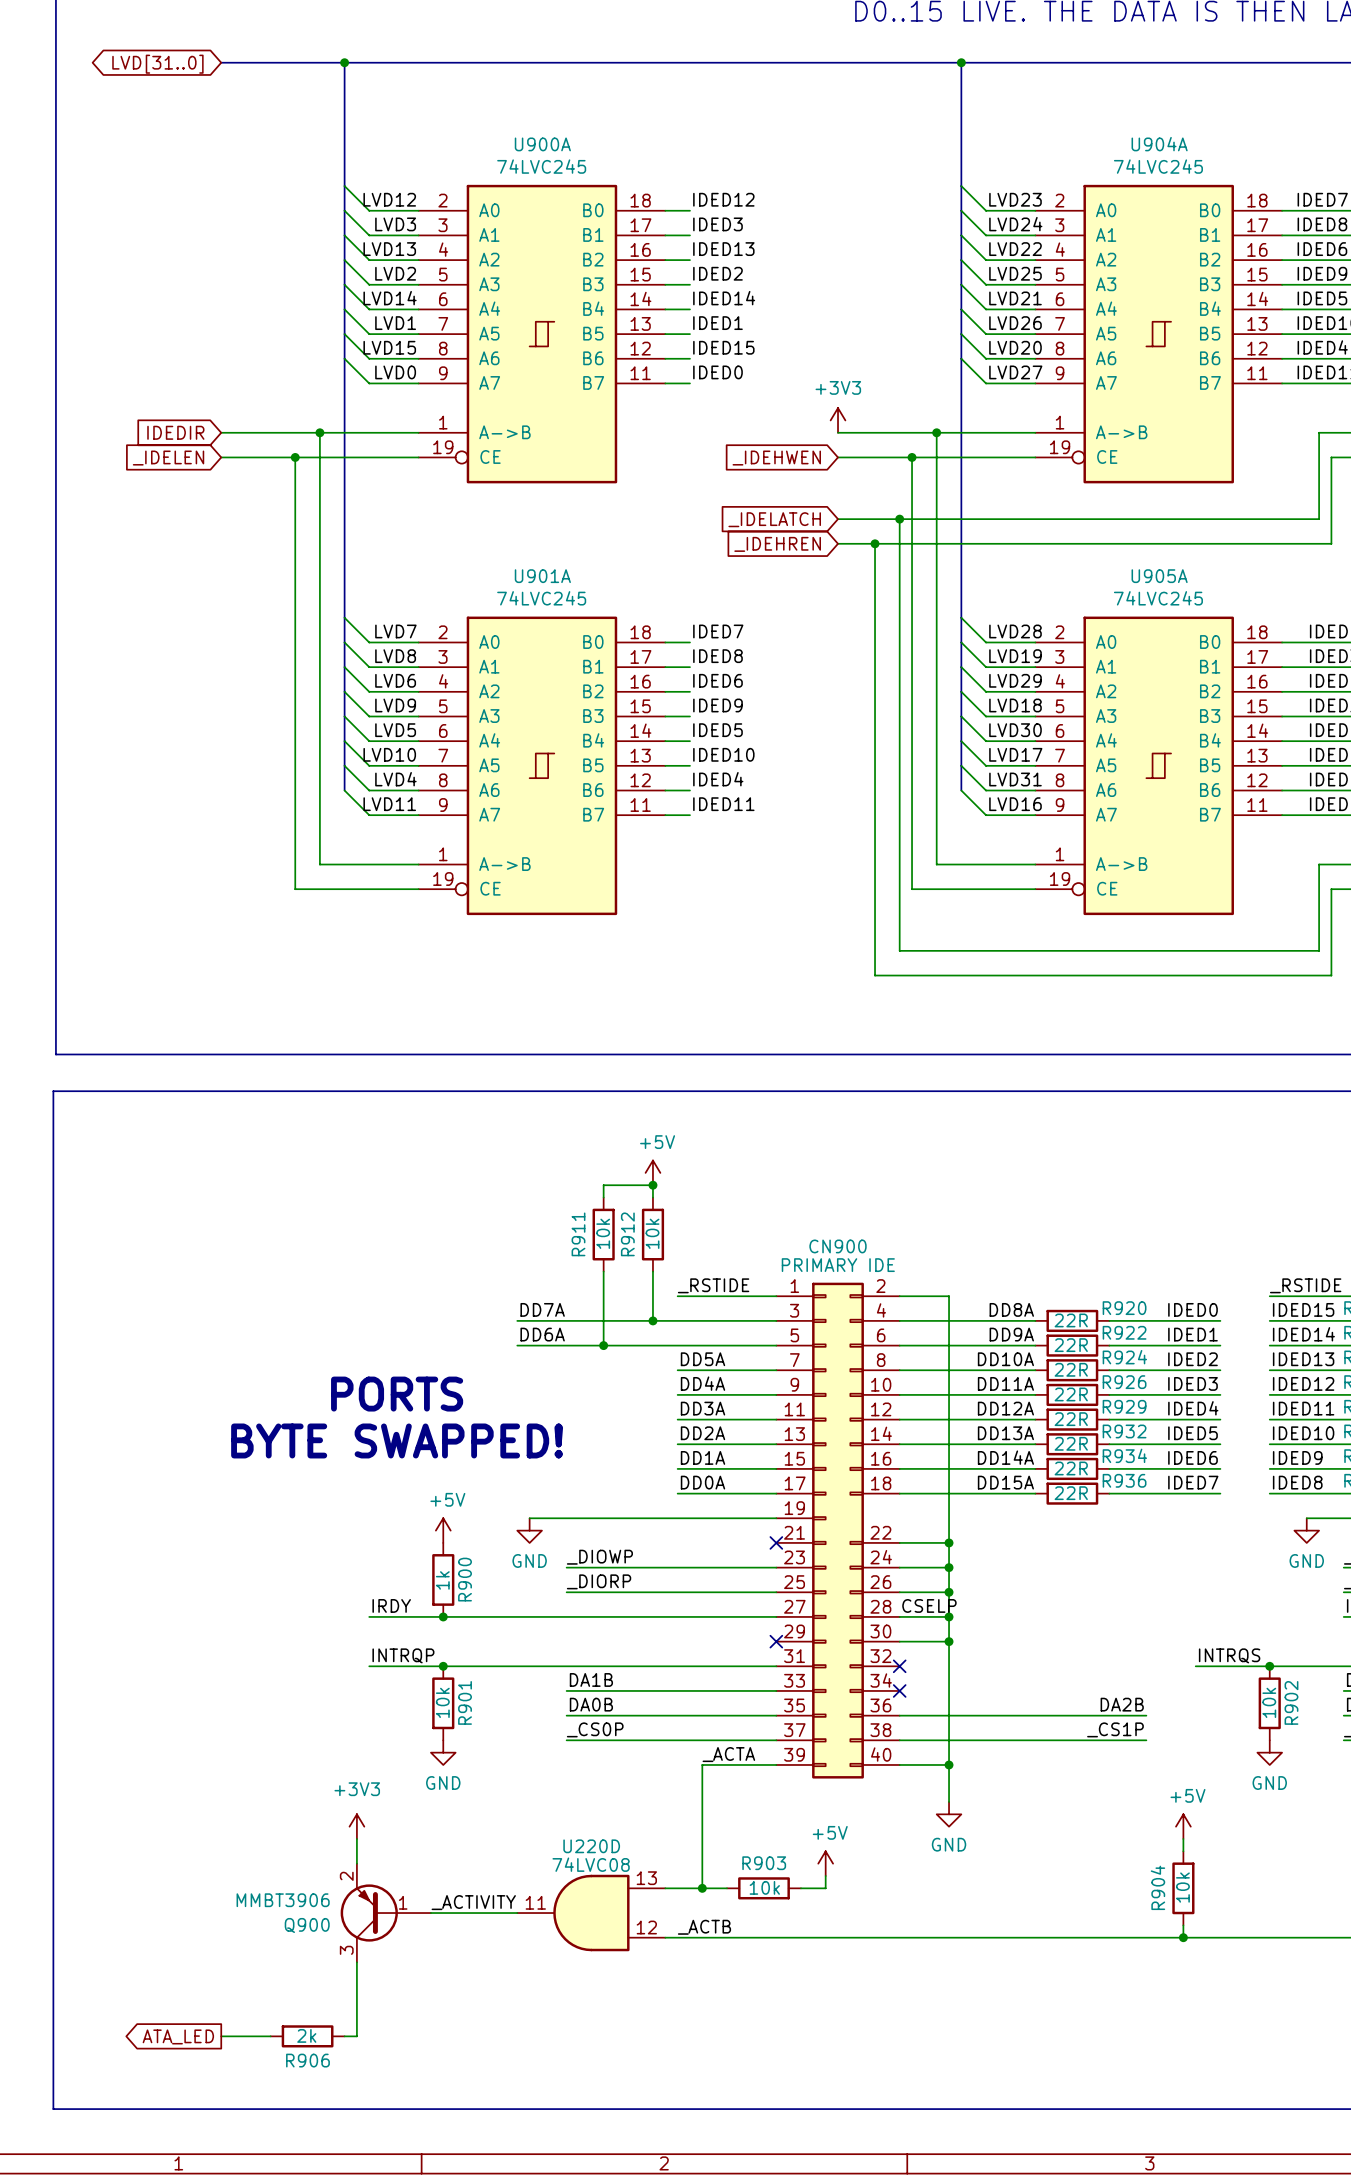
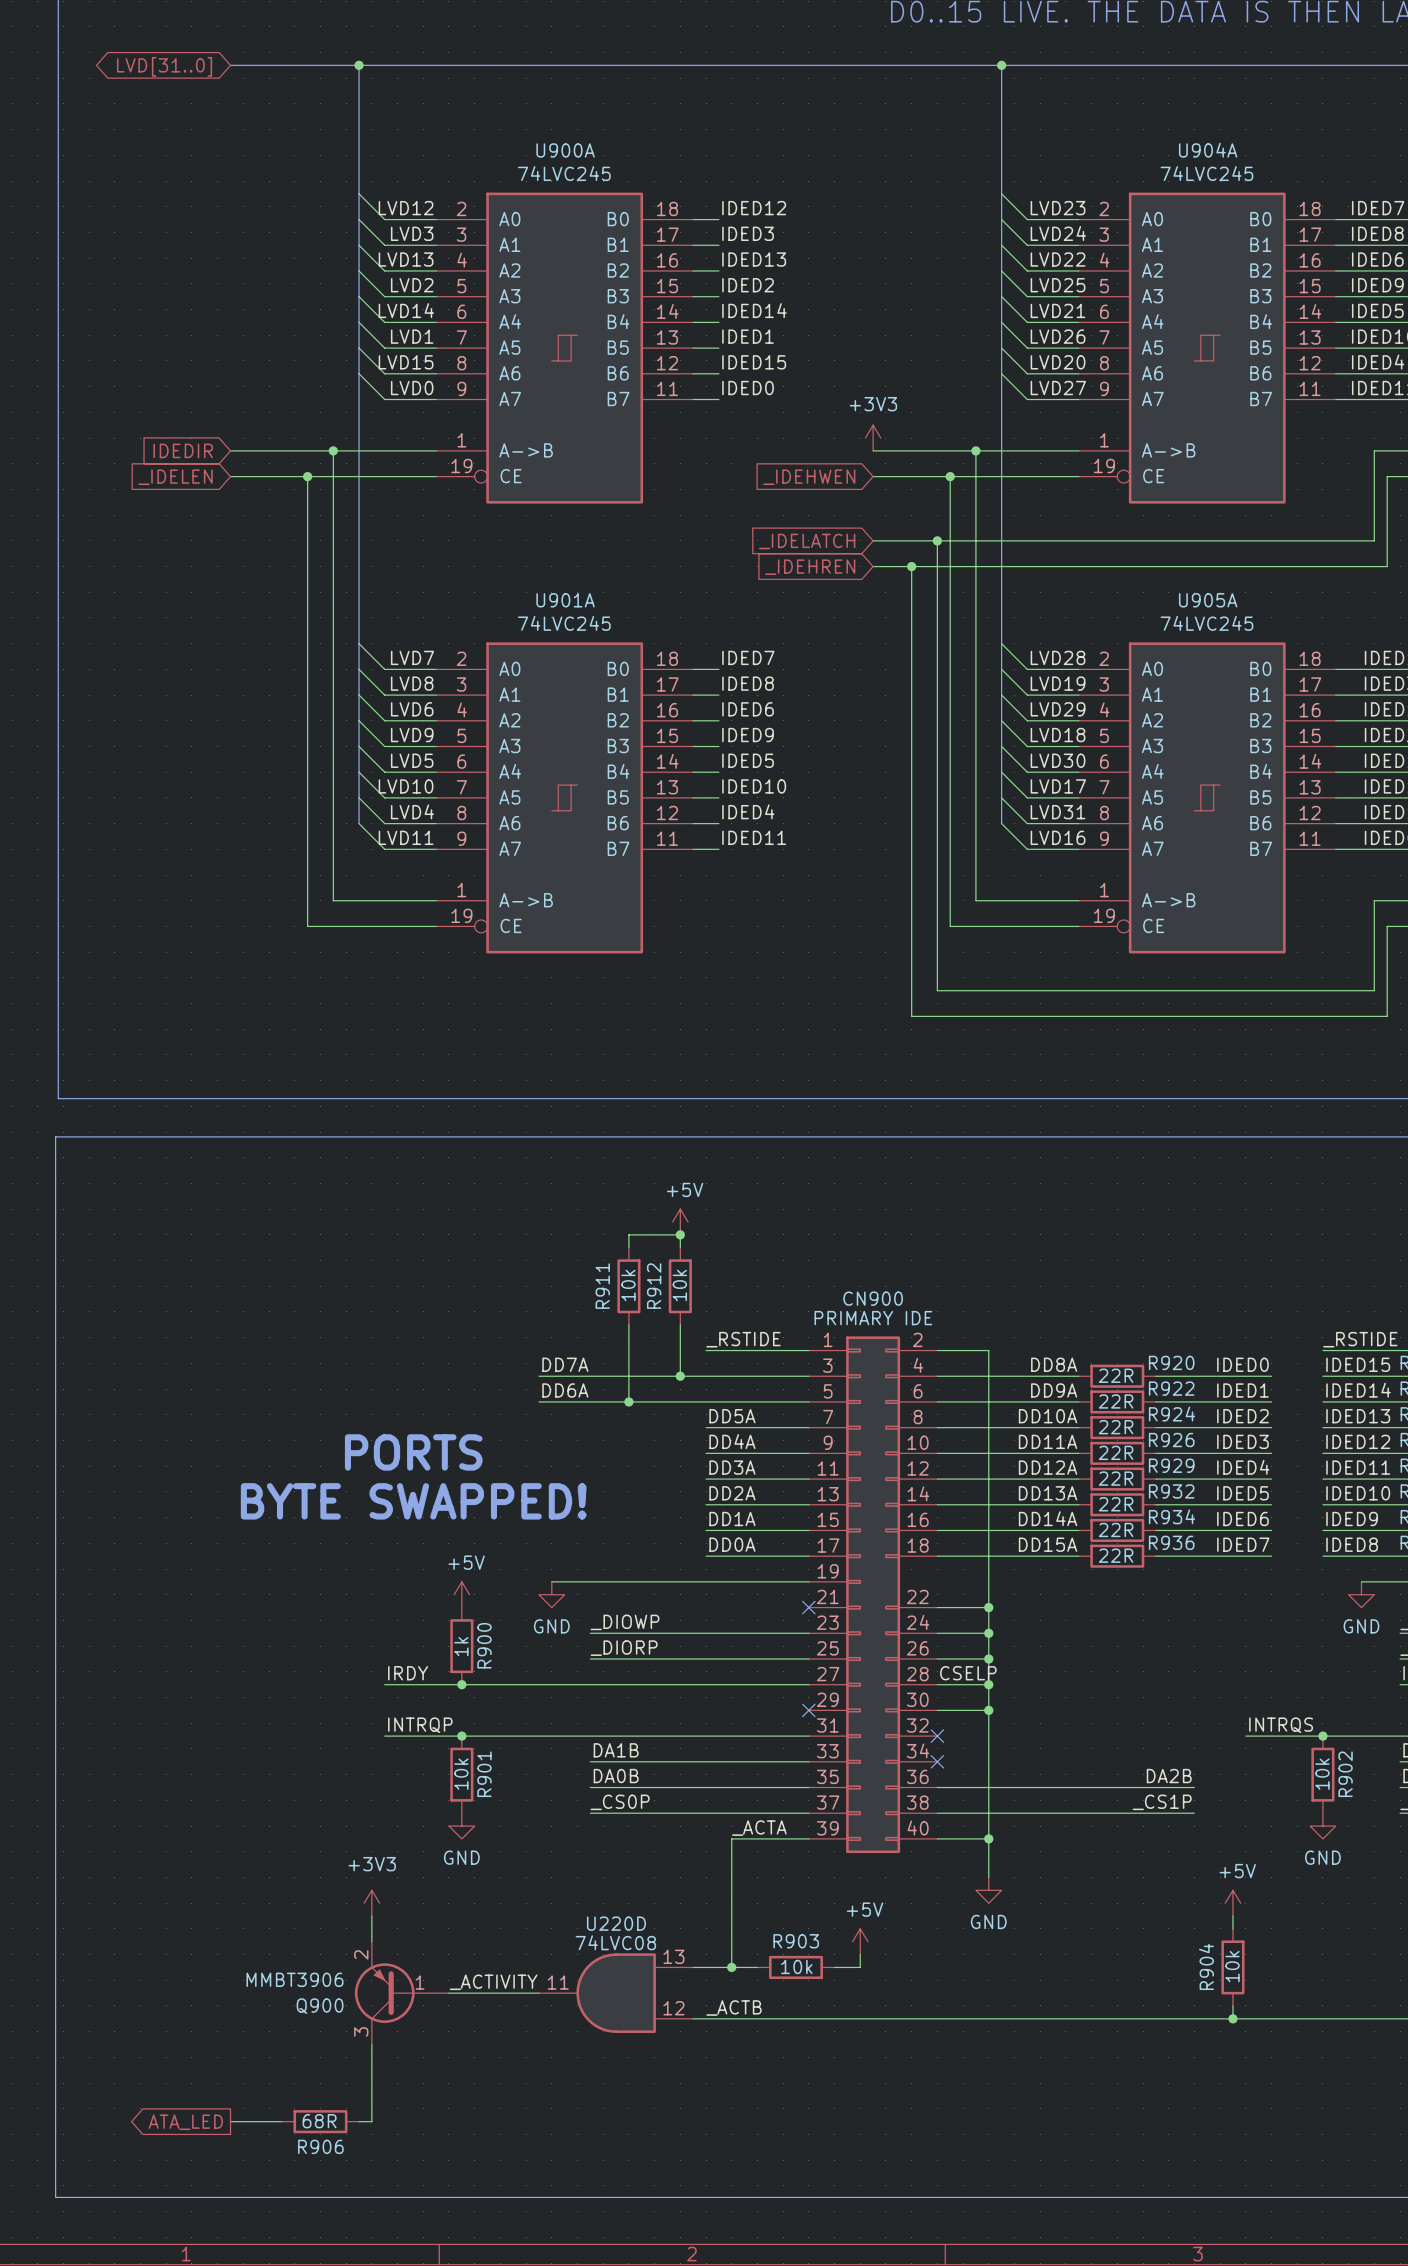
R906 value: 2k (306, 2035) -> 68R (319, 2121)

